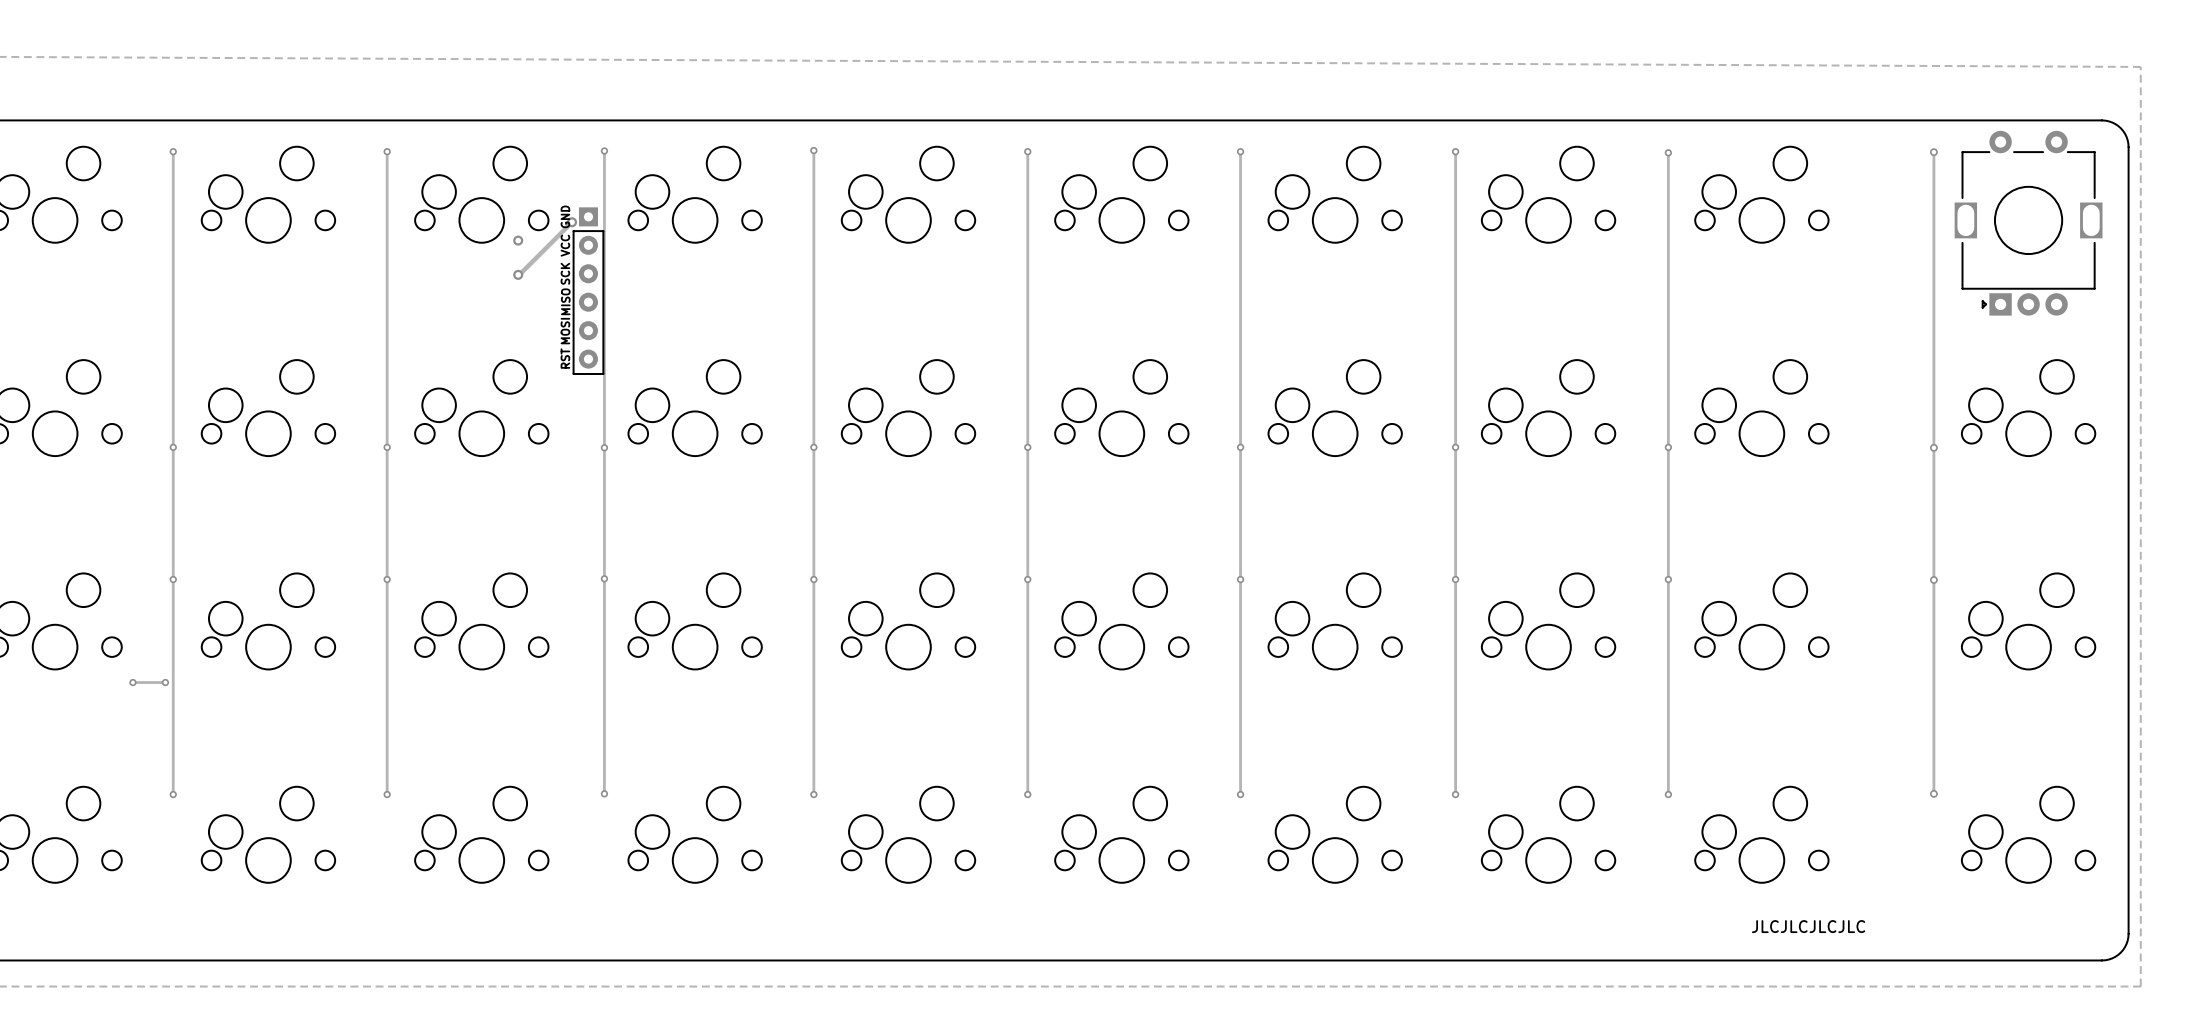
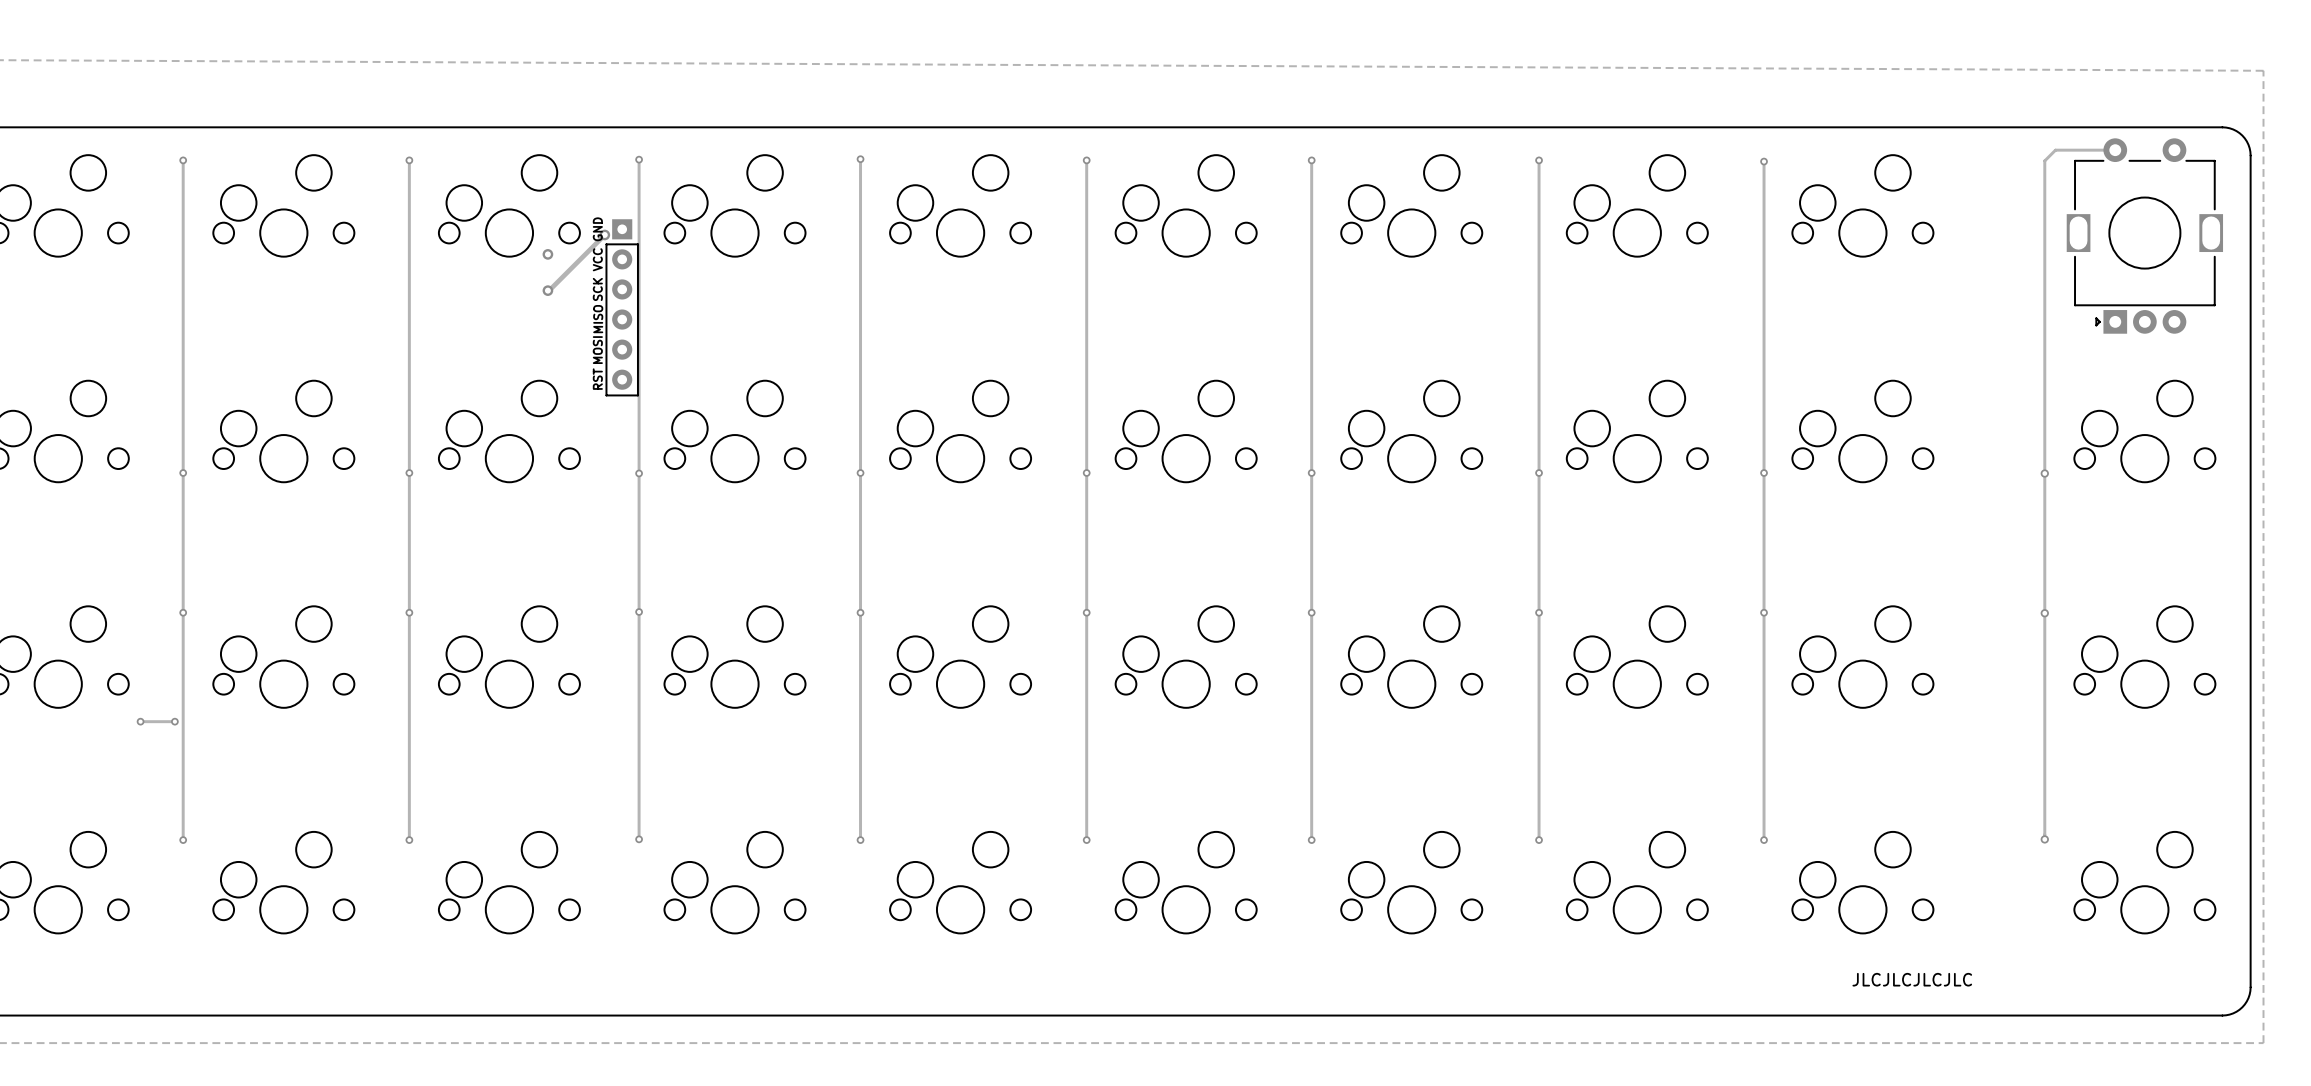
track: none -> (2115, 150) (2055, 150) (2044, 160)
via: (1933, 152) -> none

